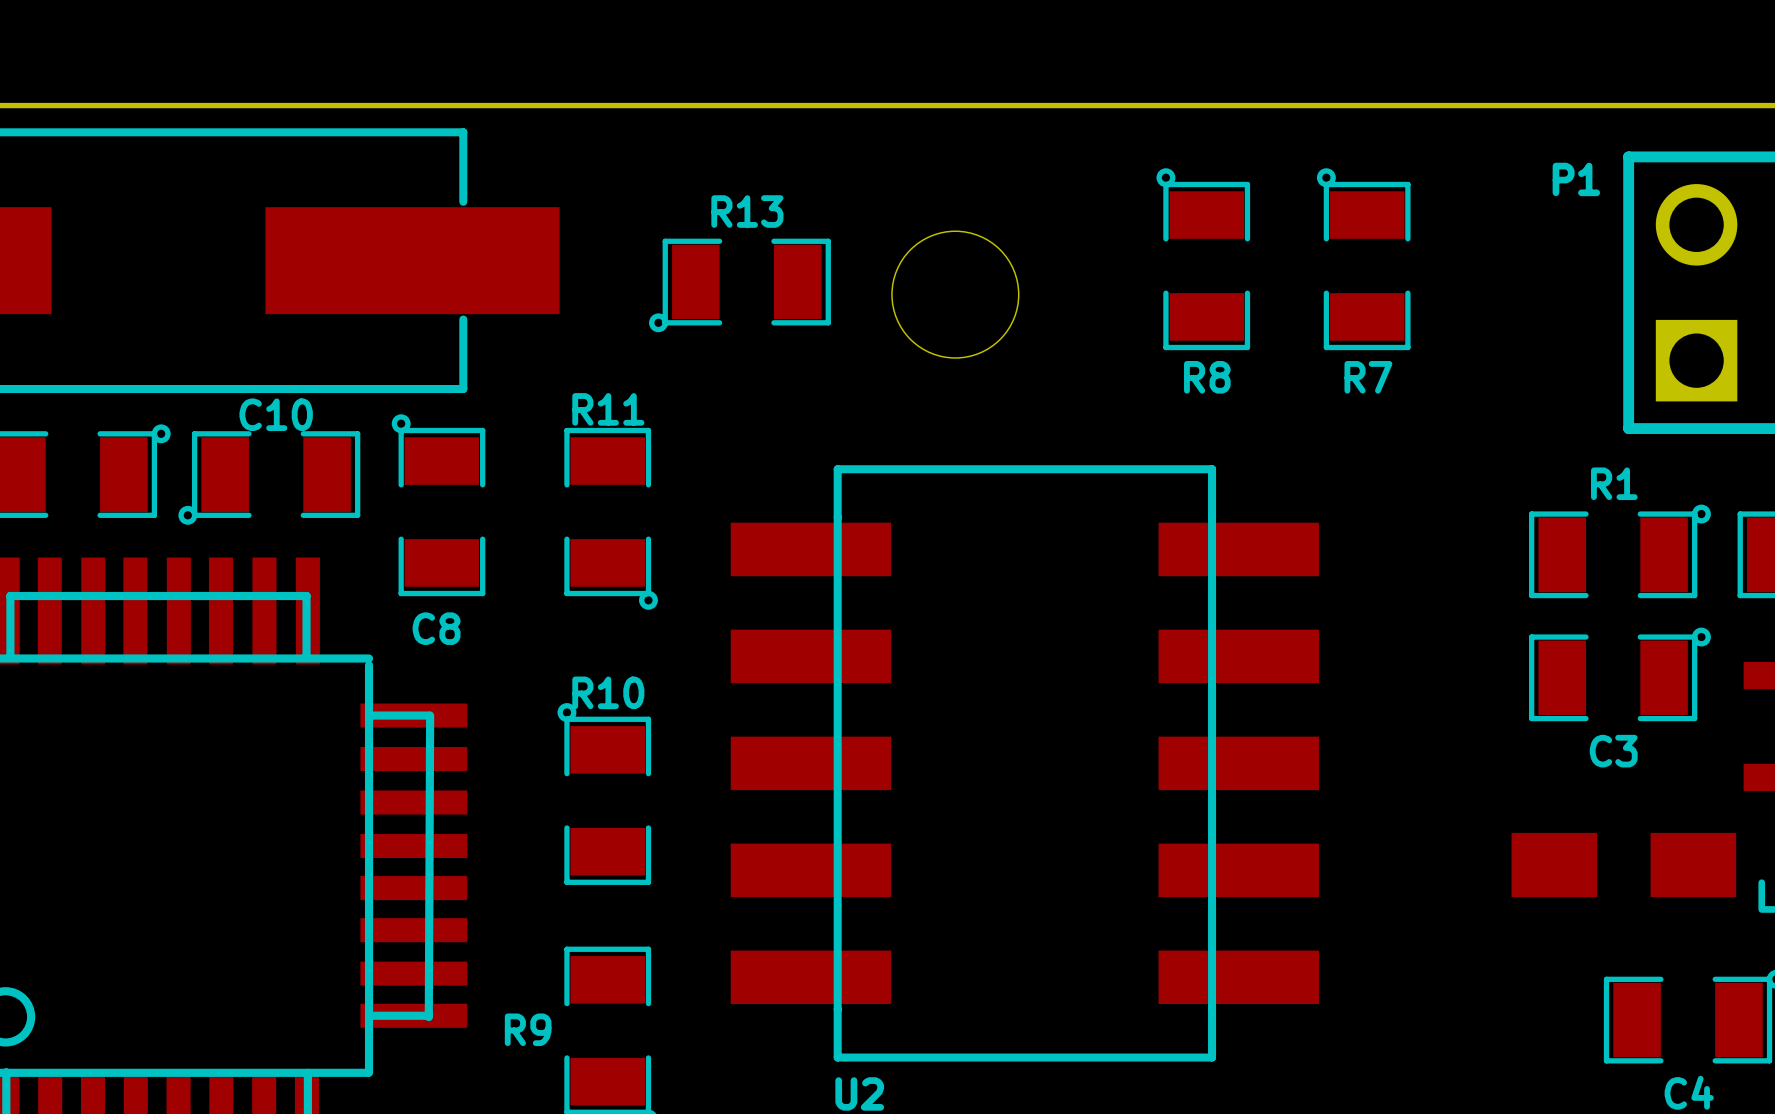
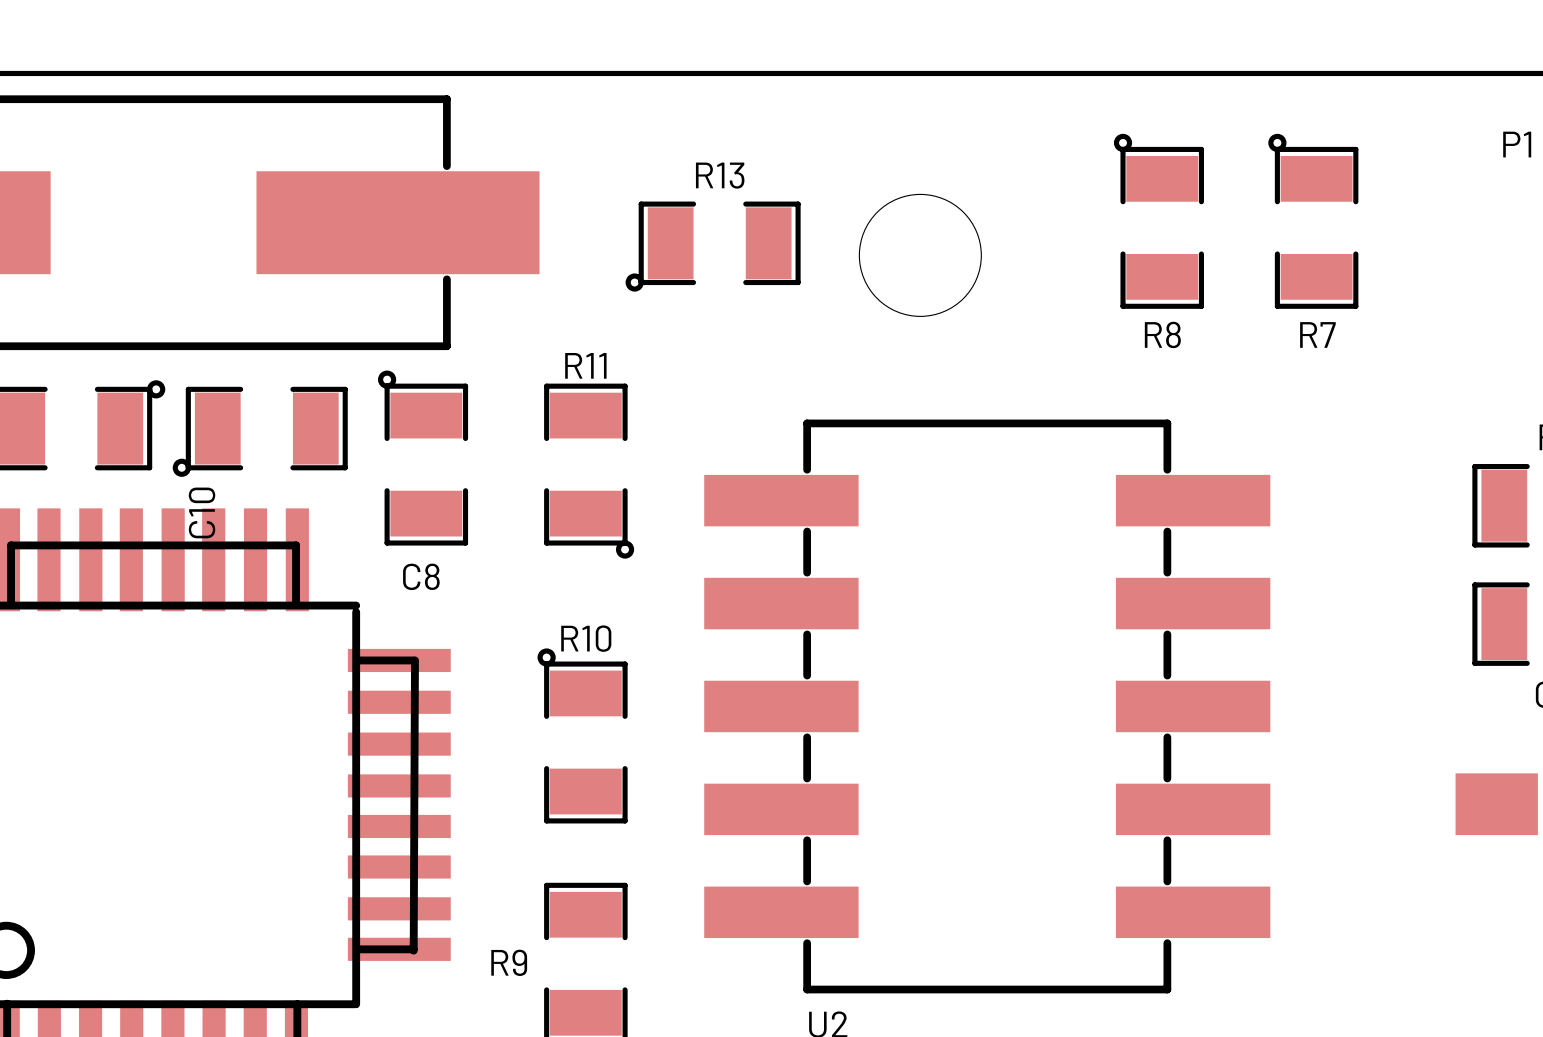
C10 name rotation: 0° (276, 414) -> 90° counterclockwise (202, 512)
C10 name position: C10 (276, 414) -> C10 (202, 512)
U2 footprint: [730, 465, 1320, 1062] -> [704, 419, 1271, 994]

